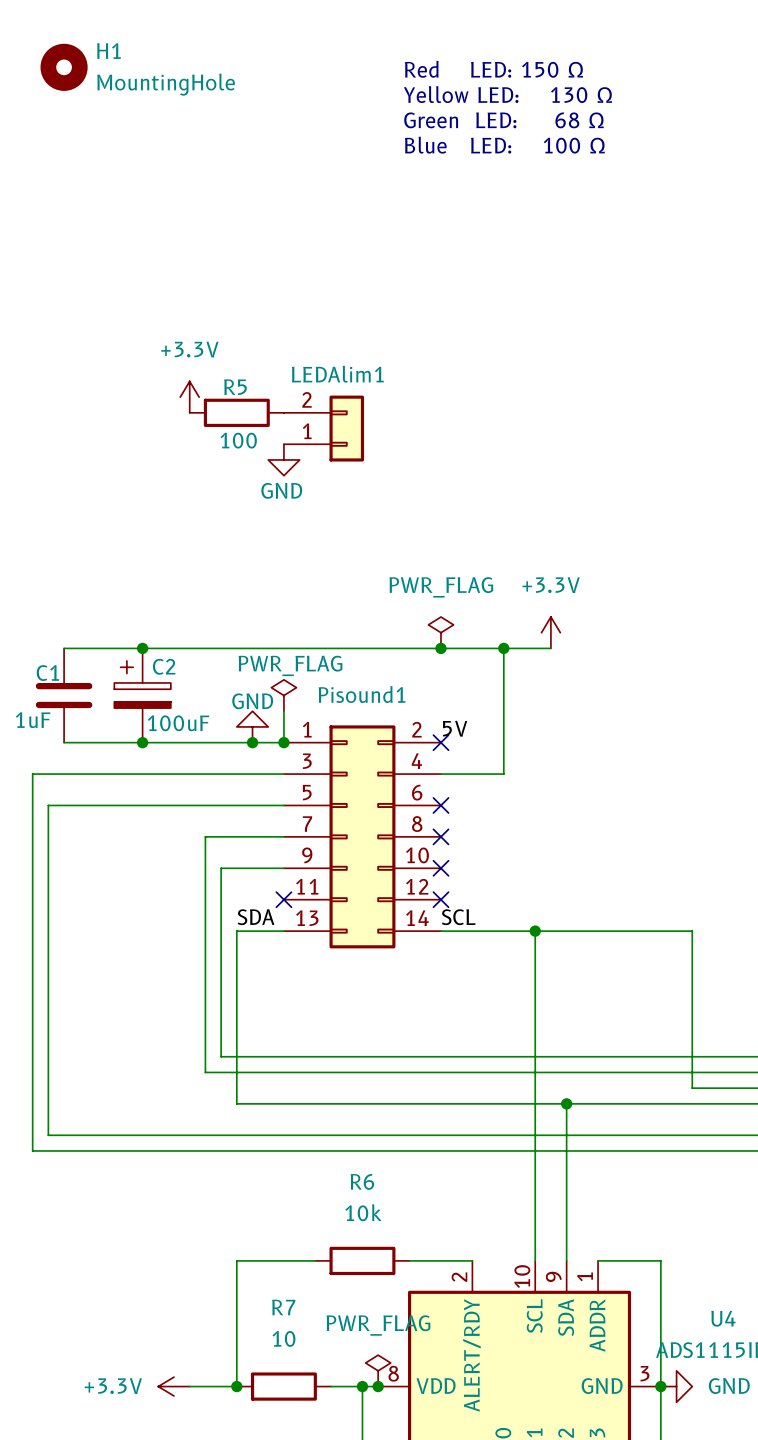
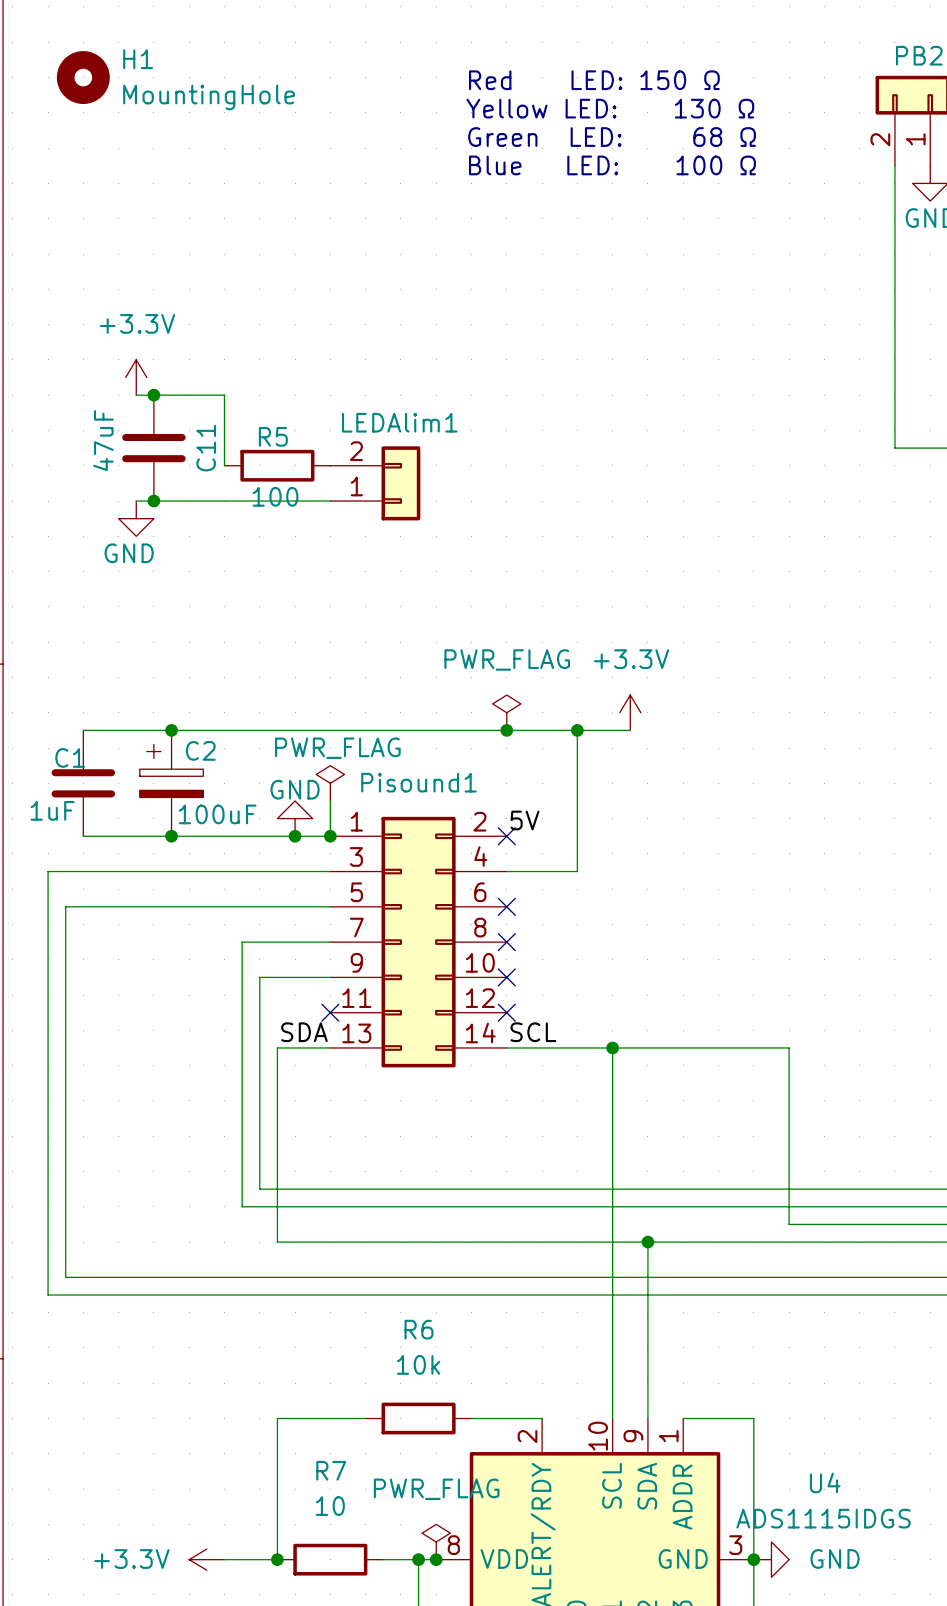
wire: none -> (136, 395) (224, 395) (224, 465)
junction: none -> (153, 395)
C11: none -> 47uF (153, 448)
power symbol position: +3.3V (189, 397) -> +3.3V (136, 377)
wire: none -> (136, 501) (330, 501)
junction: none -> (153, 501)
power symbol position: GND (283, 459) -> GND (136, 518)

